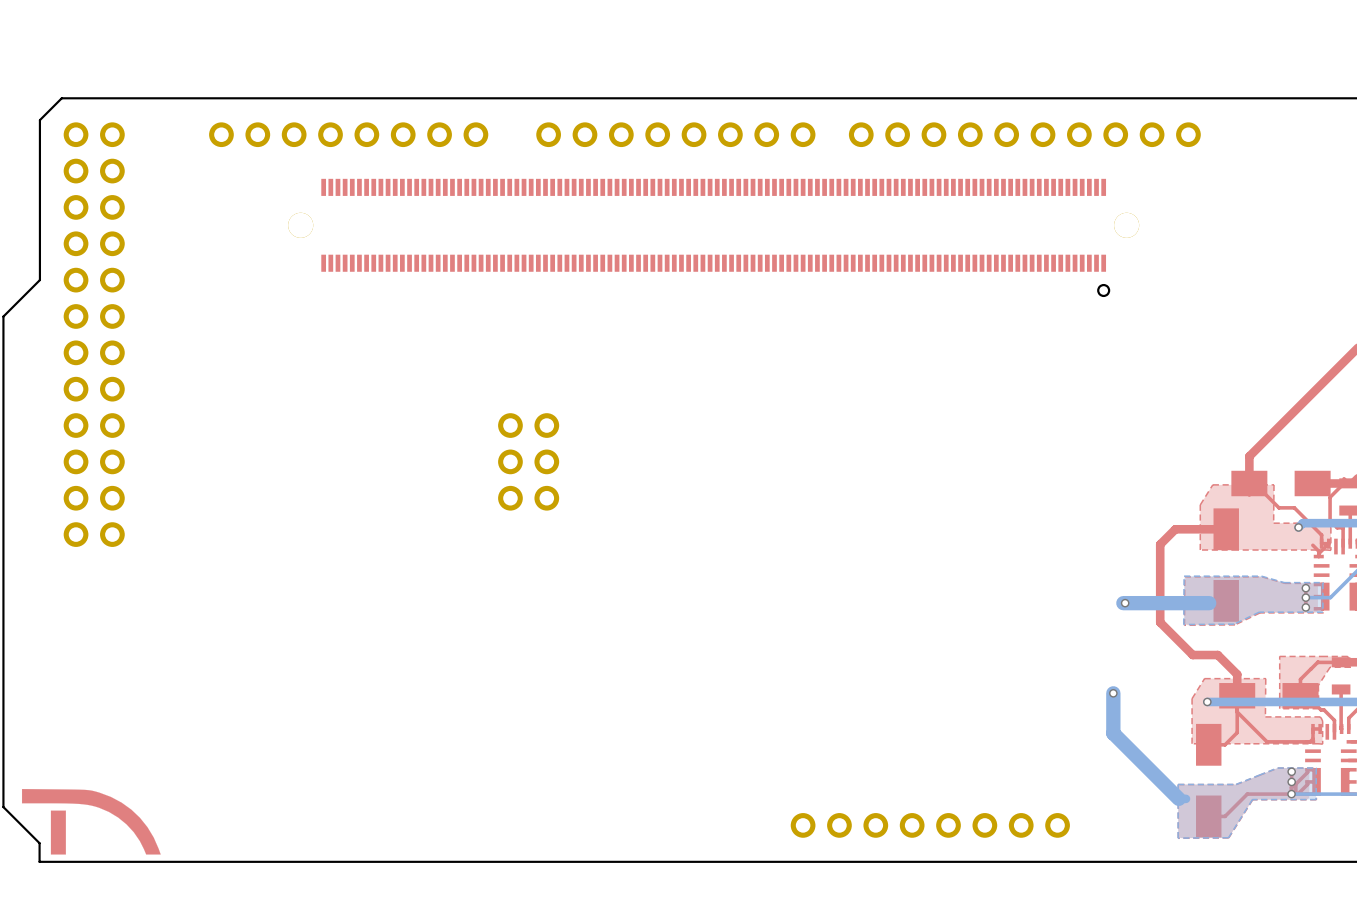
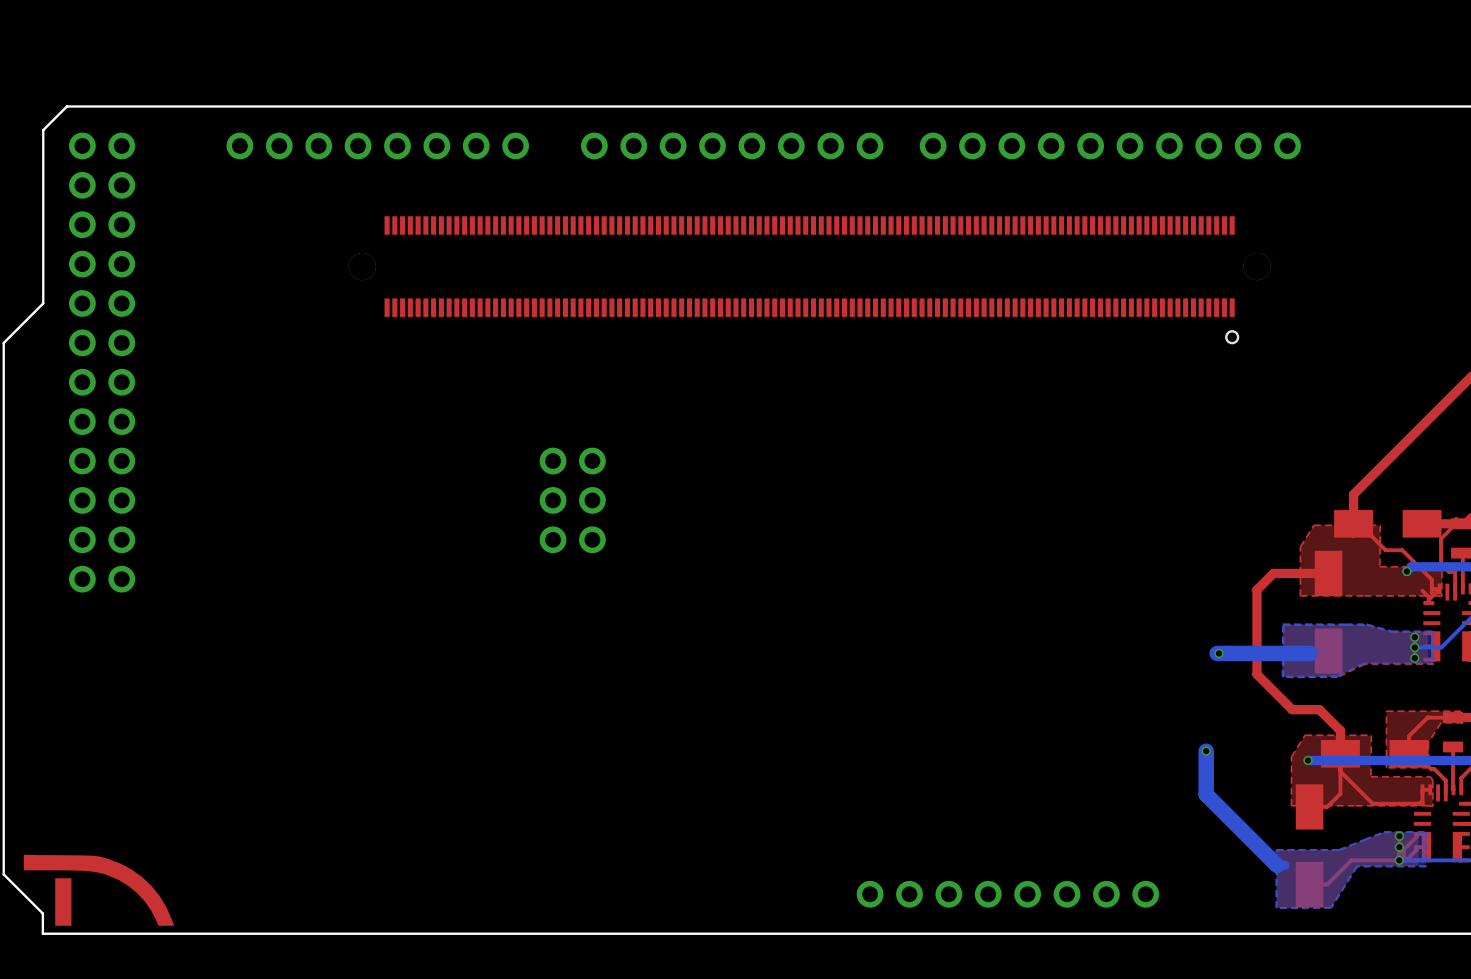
part position: (713, 237) -> (809, 280)

